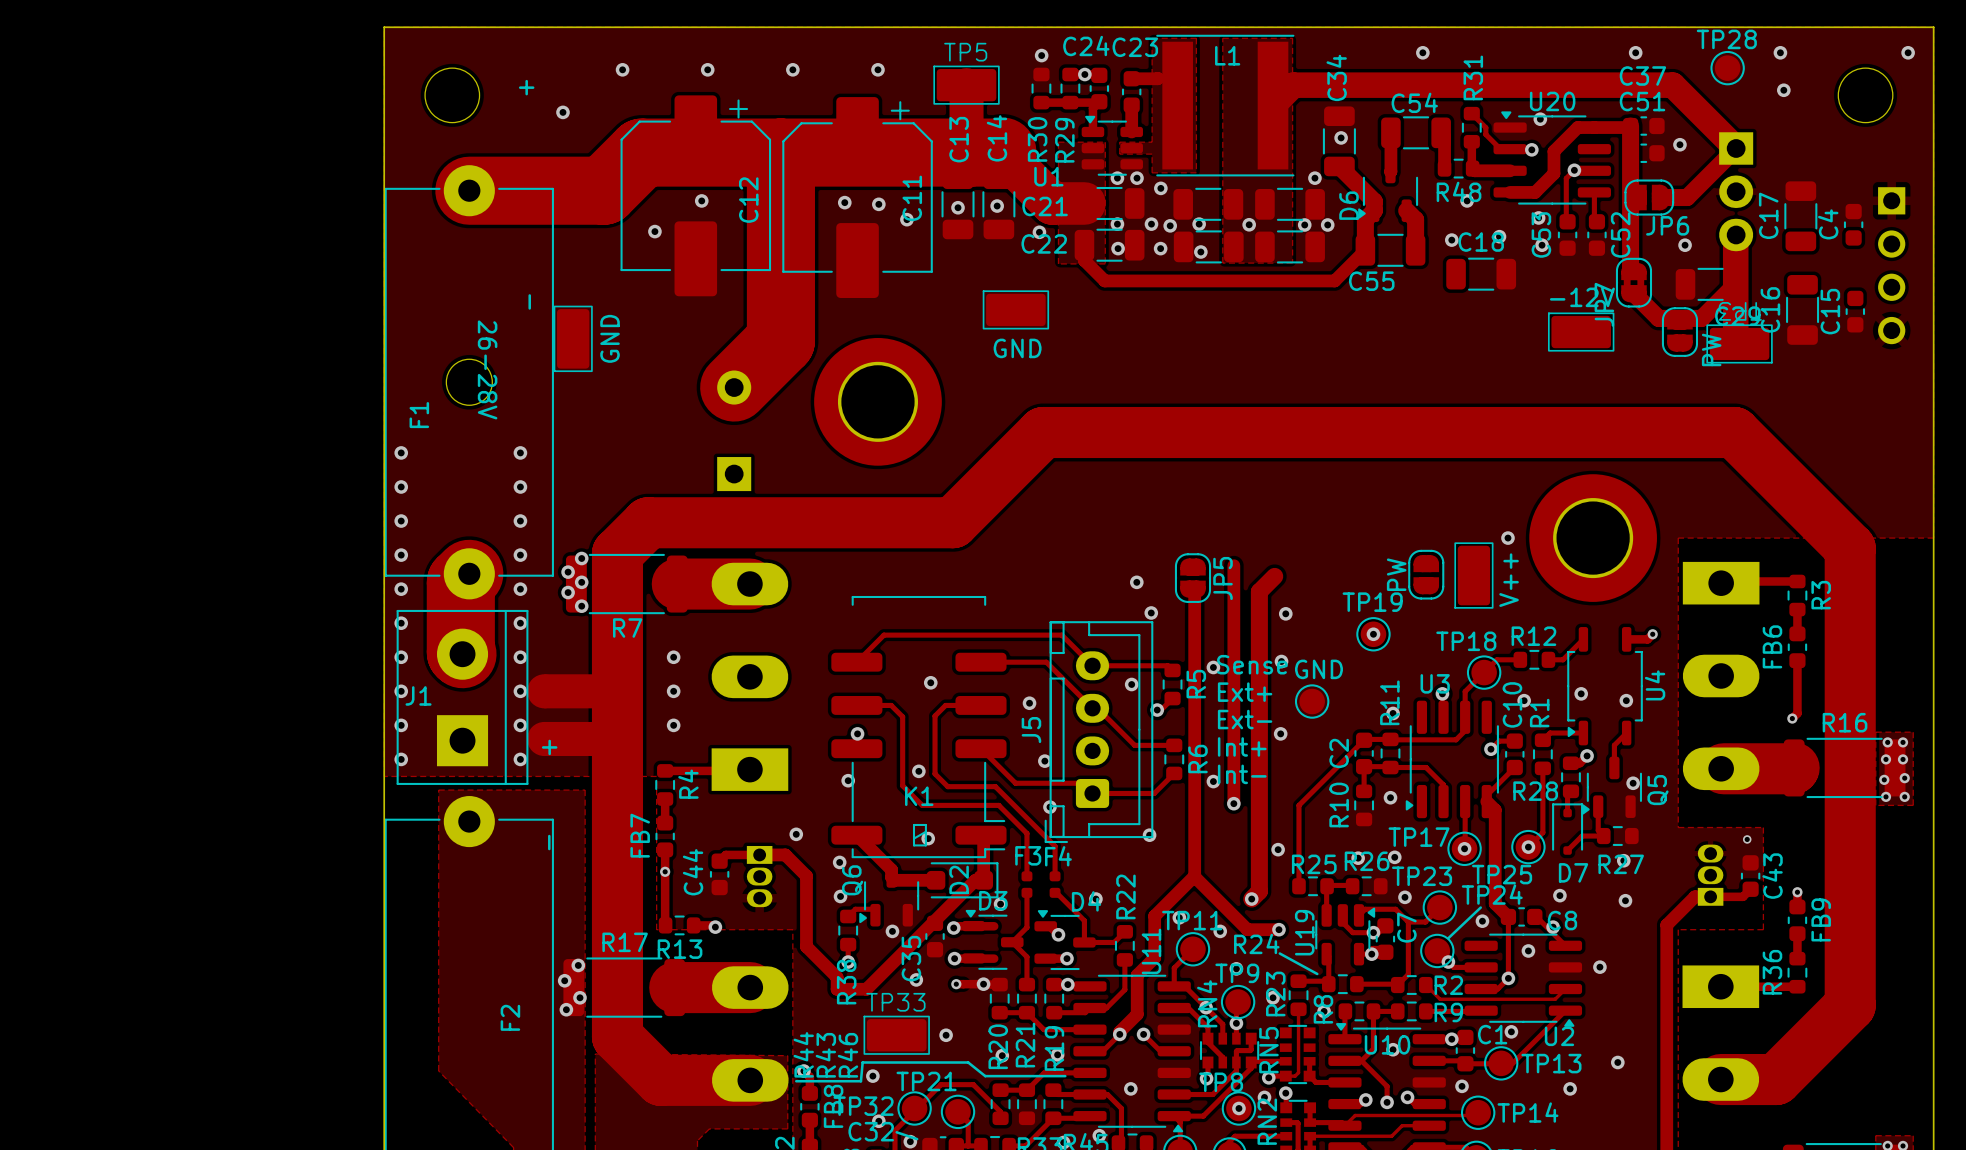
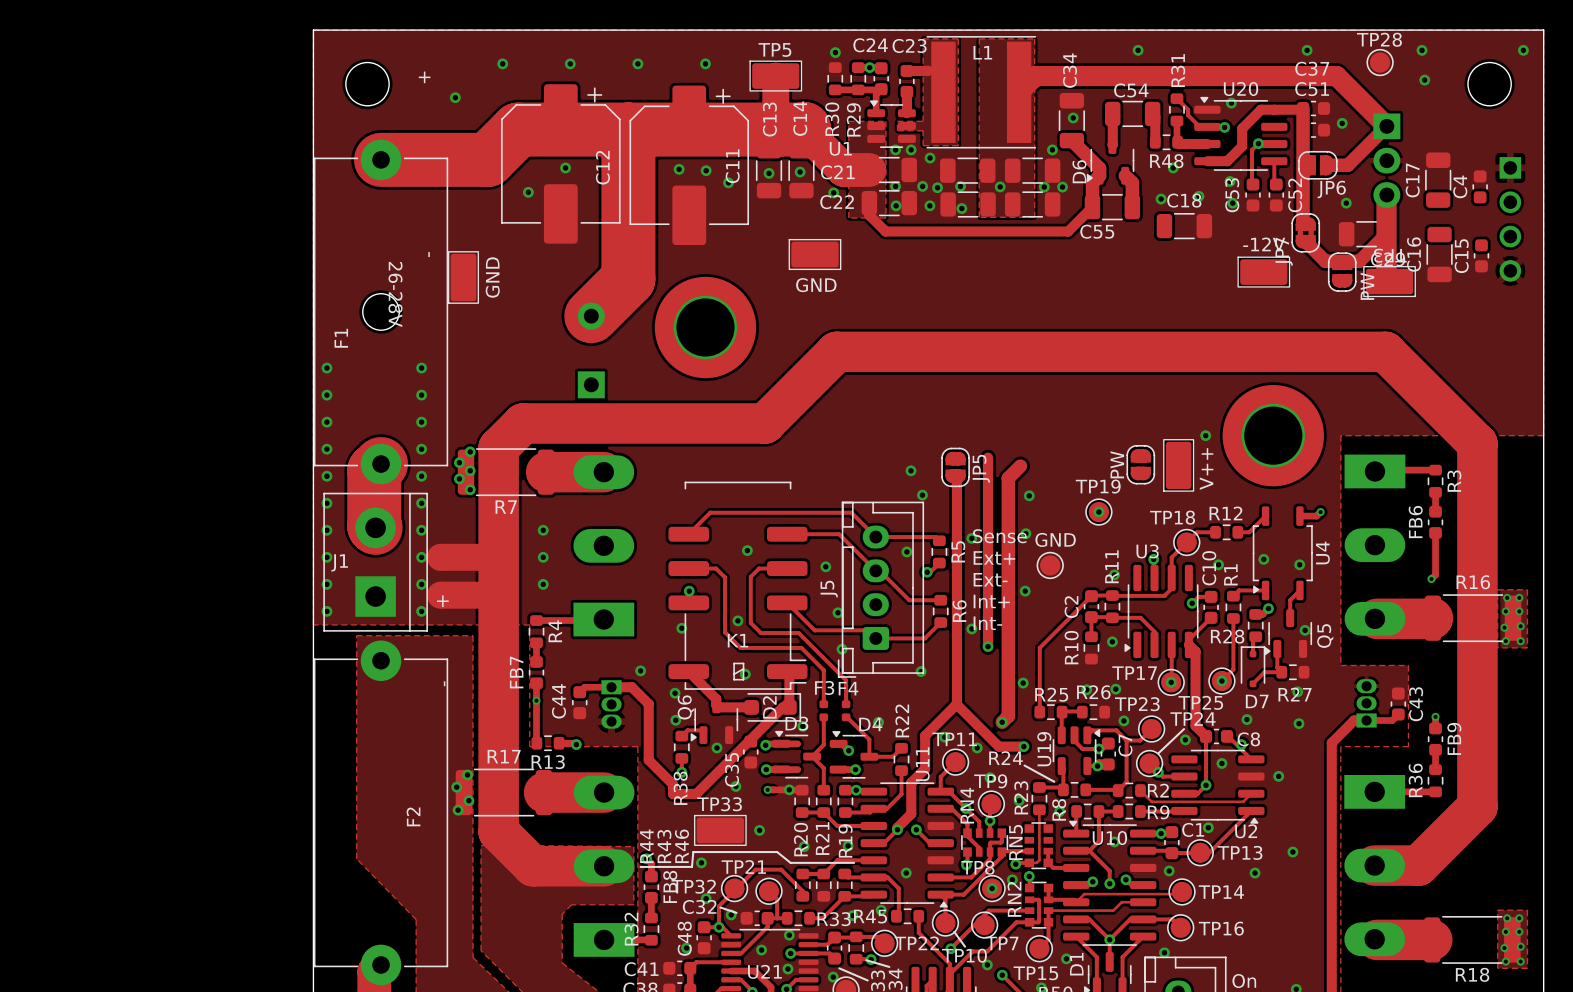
via: (1747, 839) -> none

